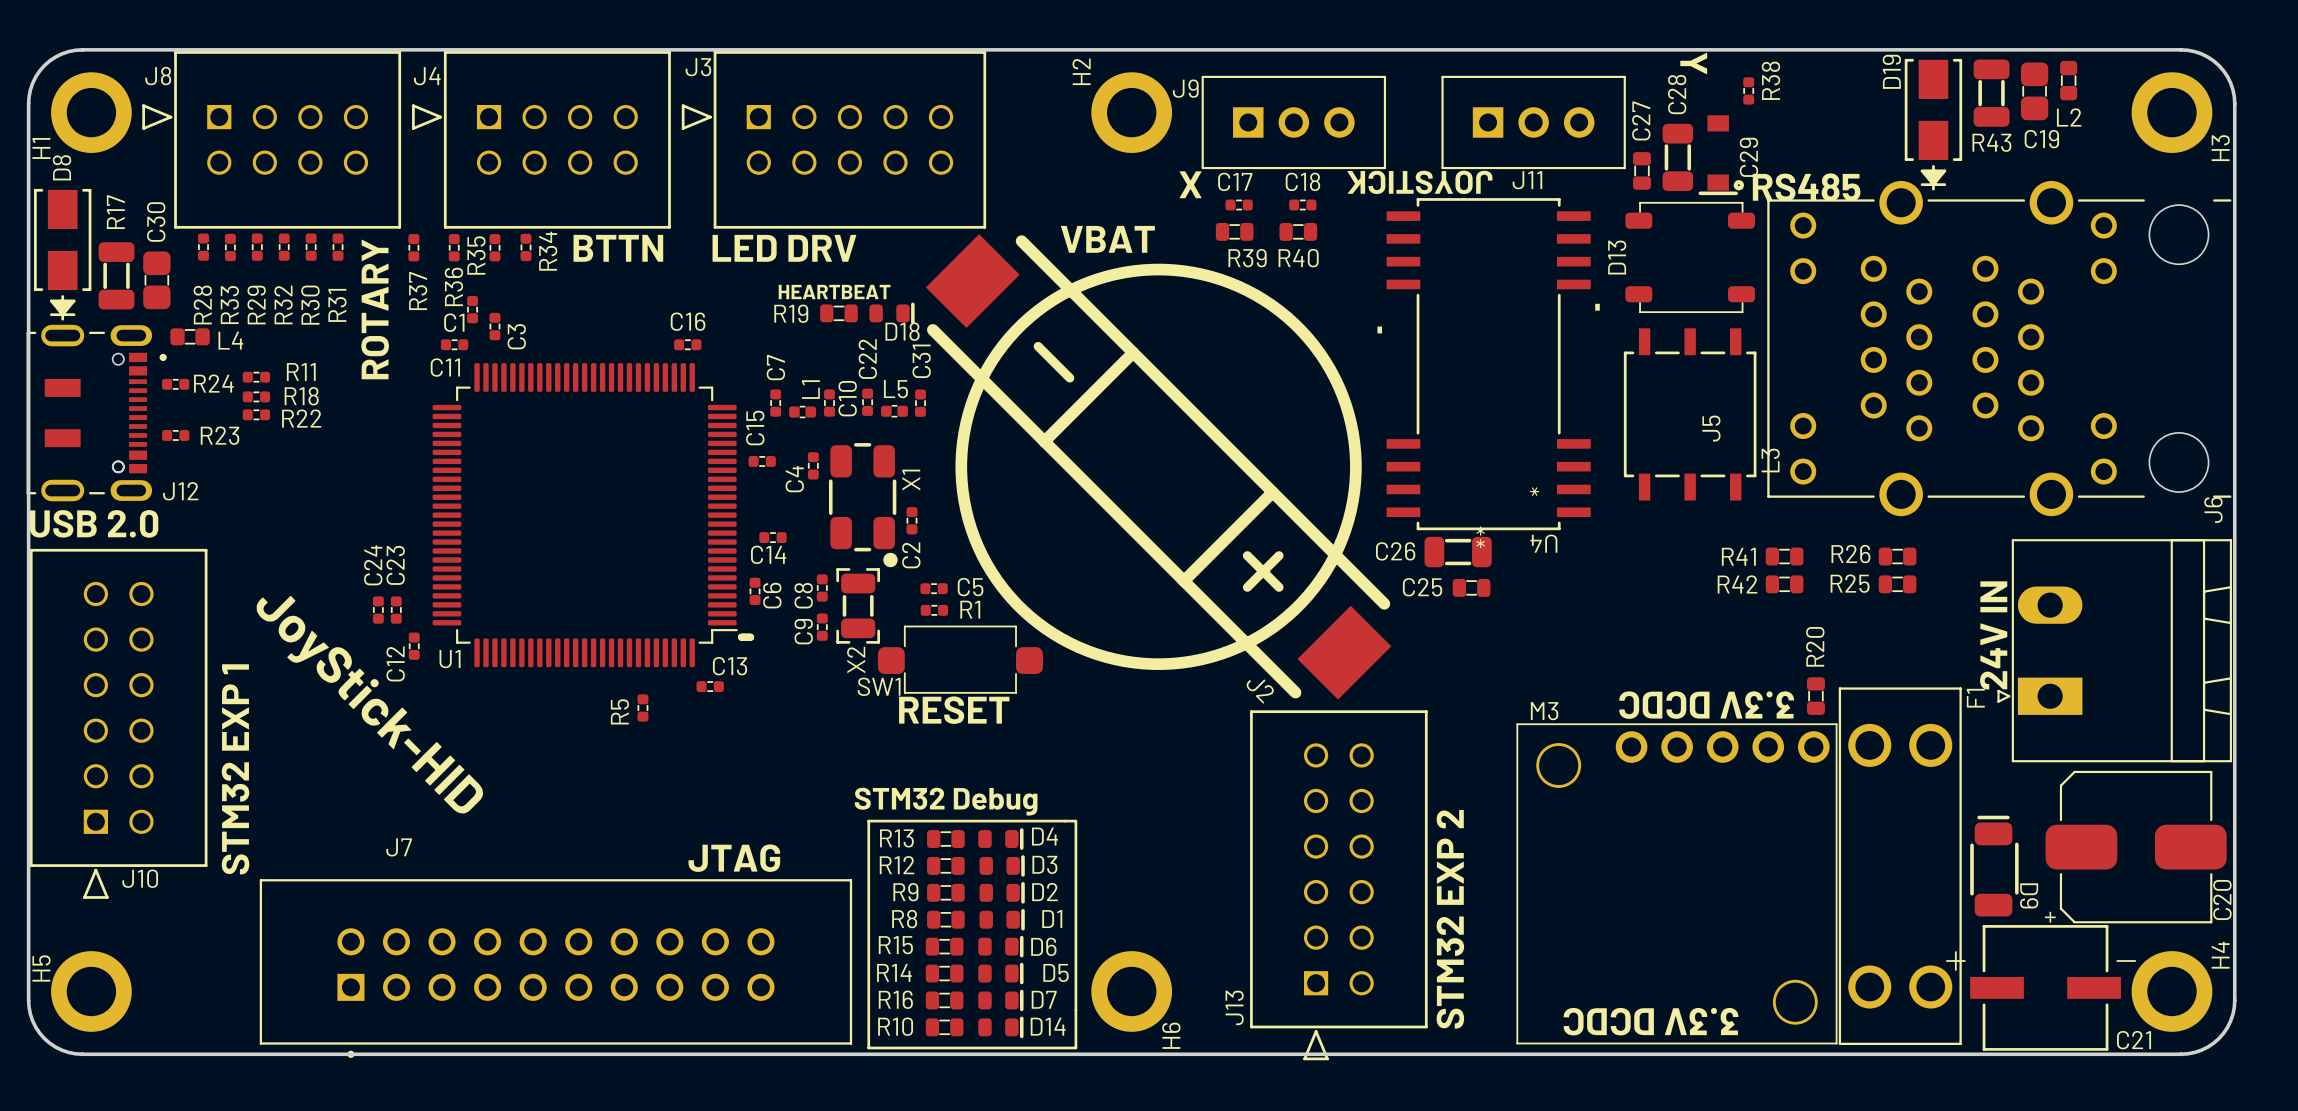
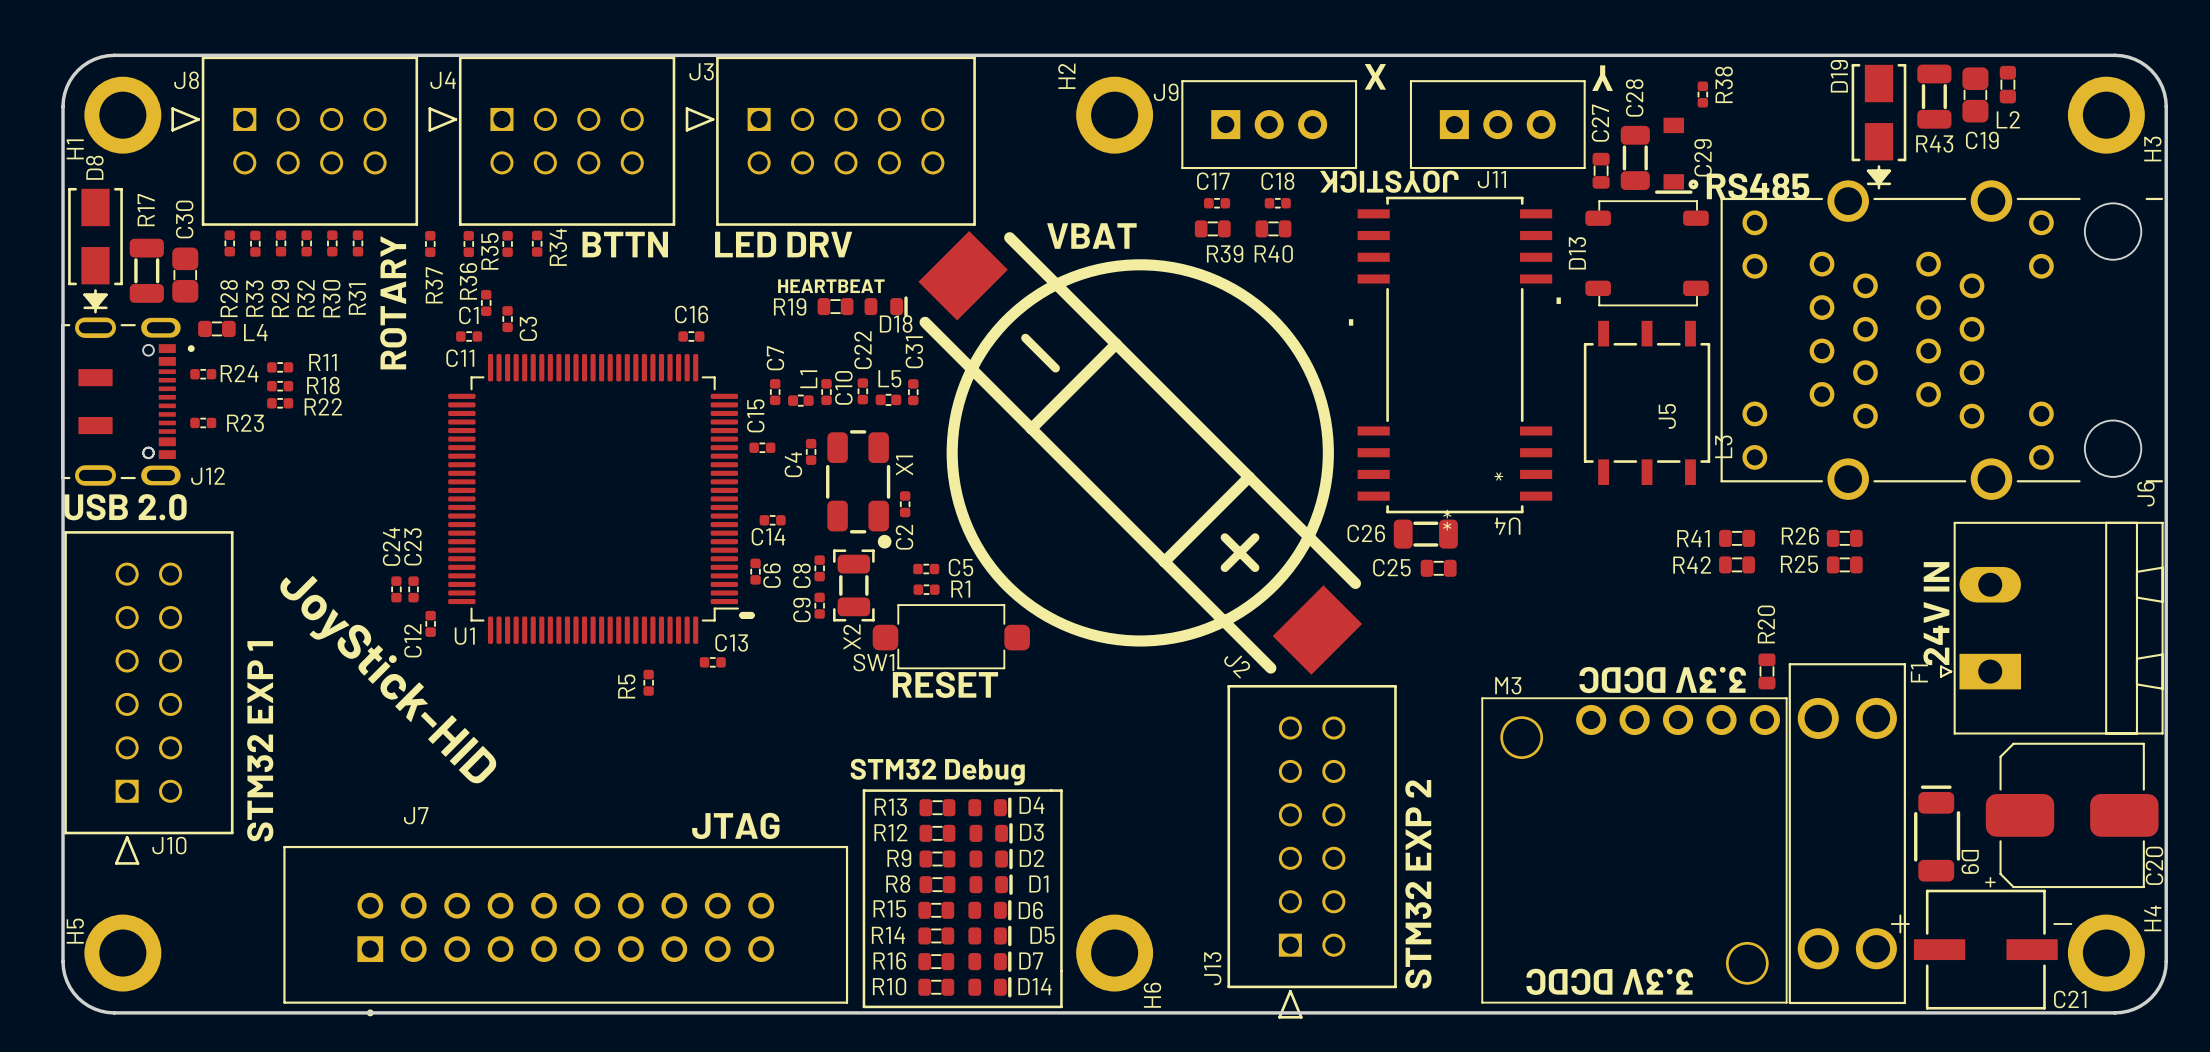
text rotation: 0° (1693, 63) -> 90° clockwise (1602, 78)
text position: X (1190, 184) -> X (1375, 76)

